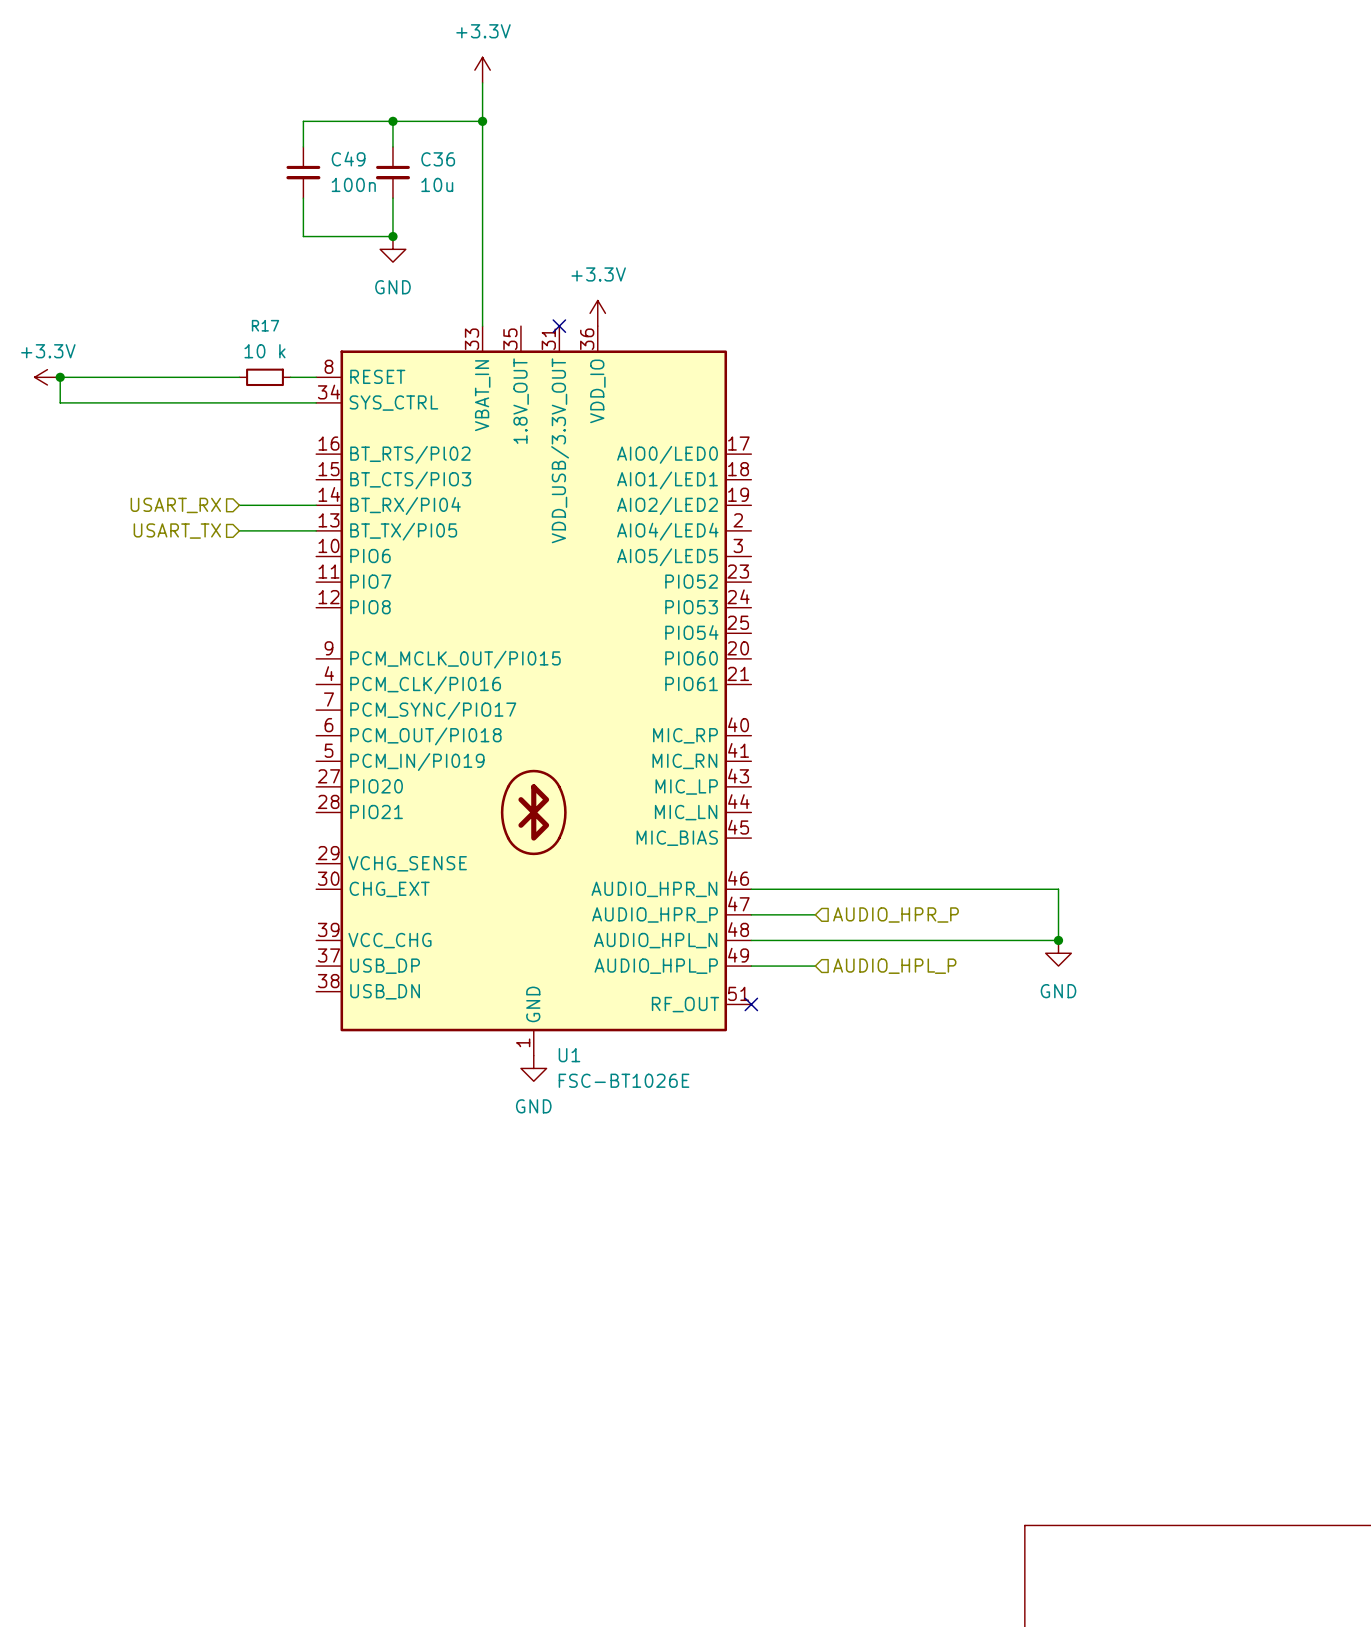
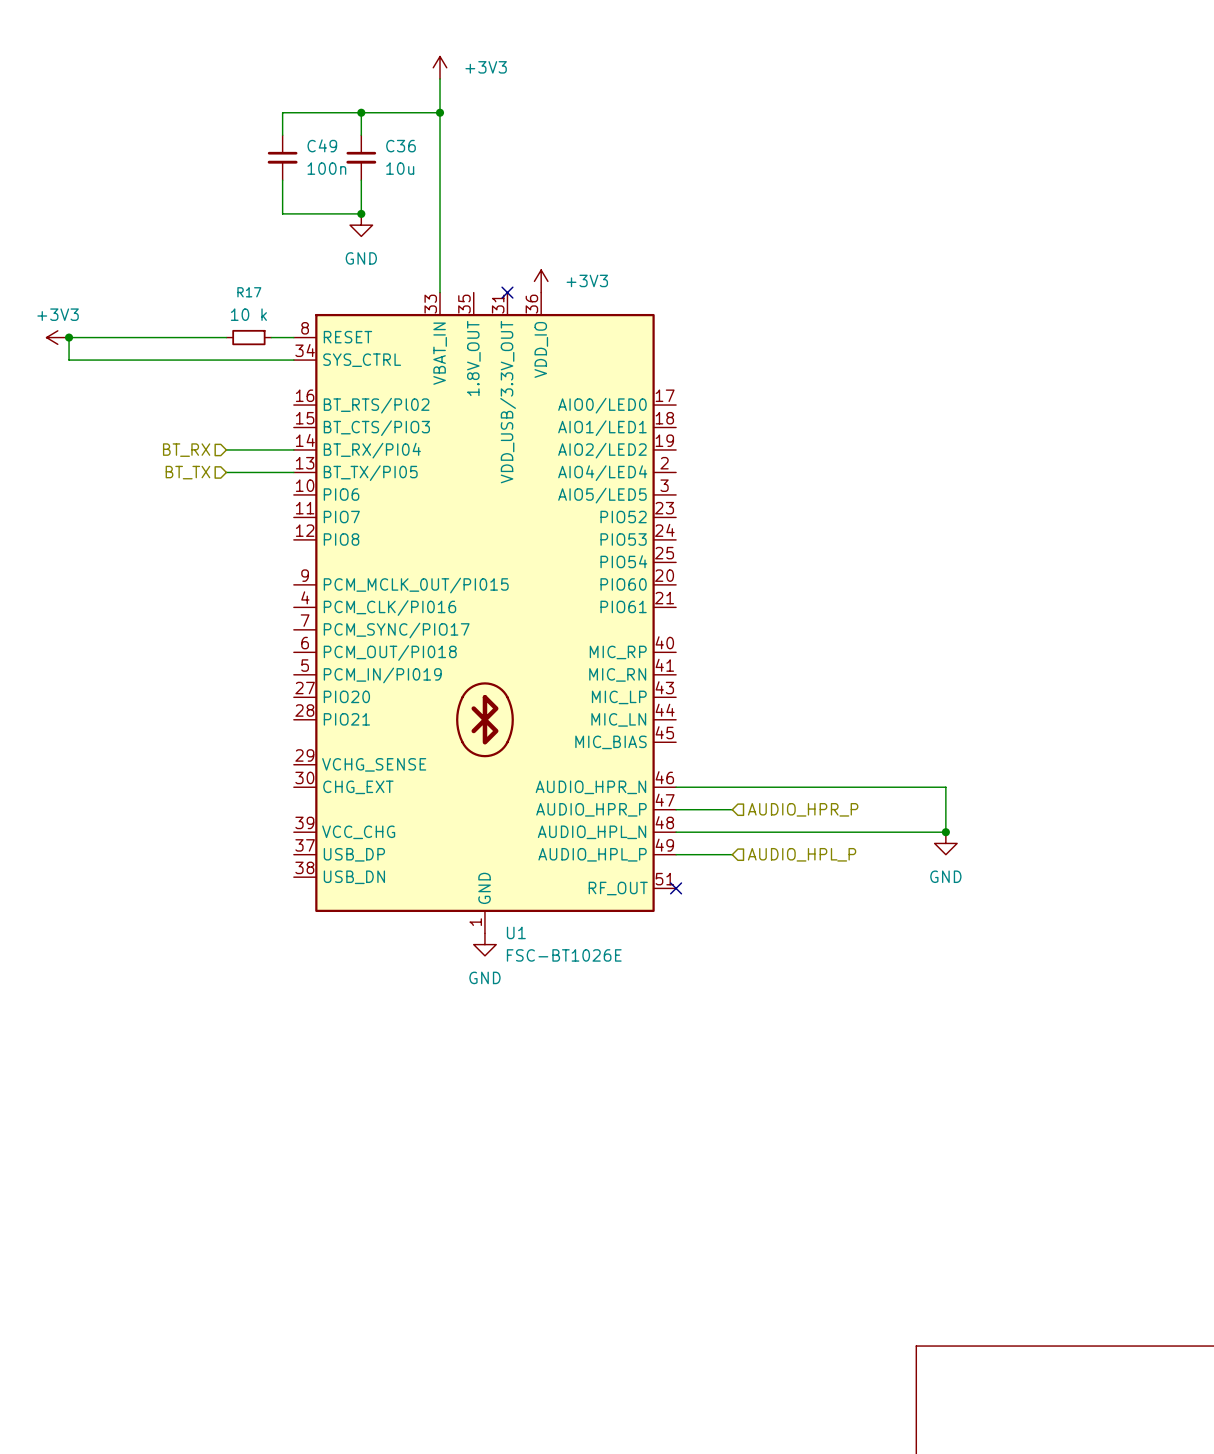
power symbol: +3.3V (482, 70) -> +3V3 (440, 67)
power symbol: +3.3V (597, 313) -> +3V3 (541, 281)
power symbol: +3.3V (47, 377) -> +3V3 (57, 337)
hierarchical label: USART_RX (175, 505) -> BT_RX (186, 450)
hierarchical label: USART_TX (177, 531) -> BT_TX (187, 472)

